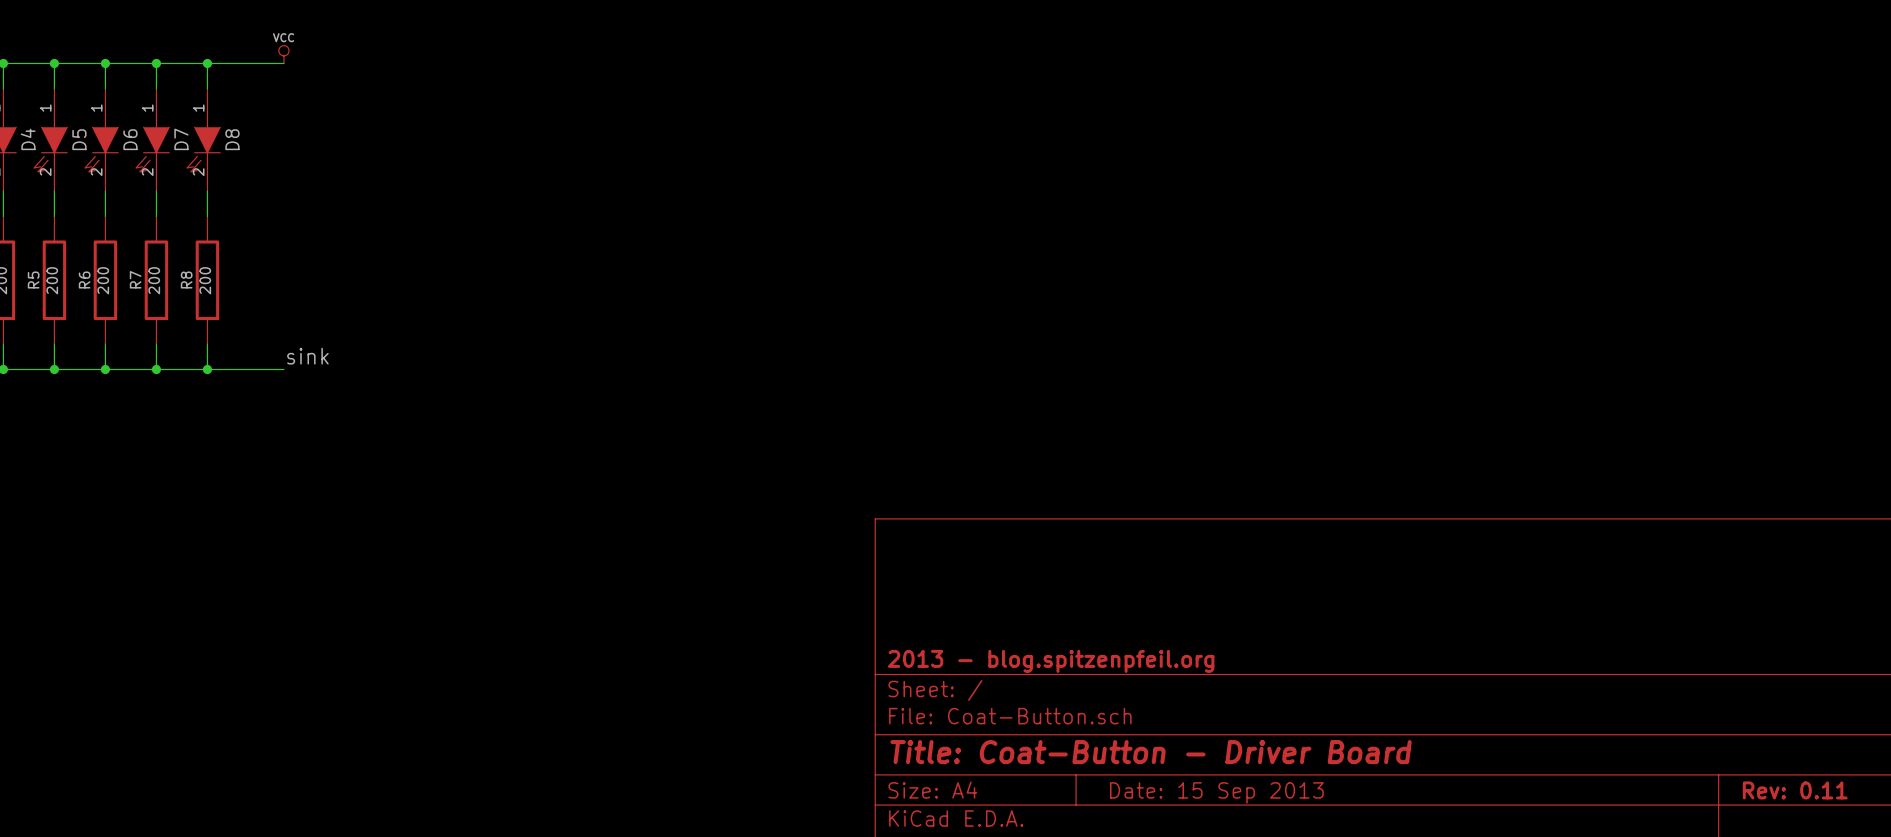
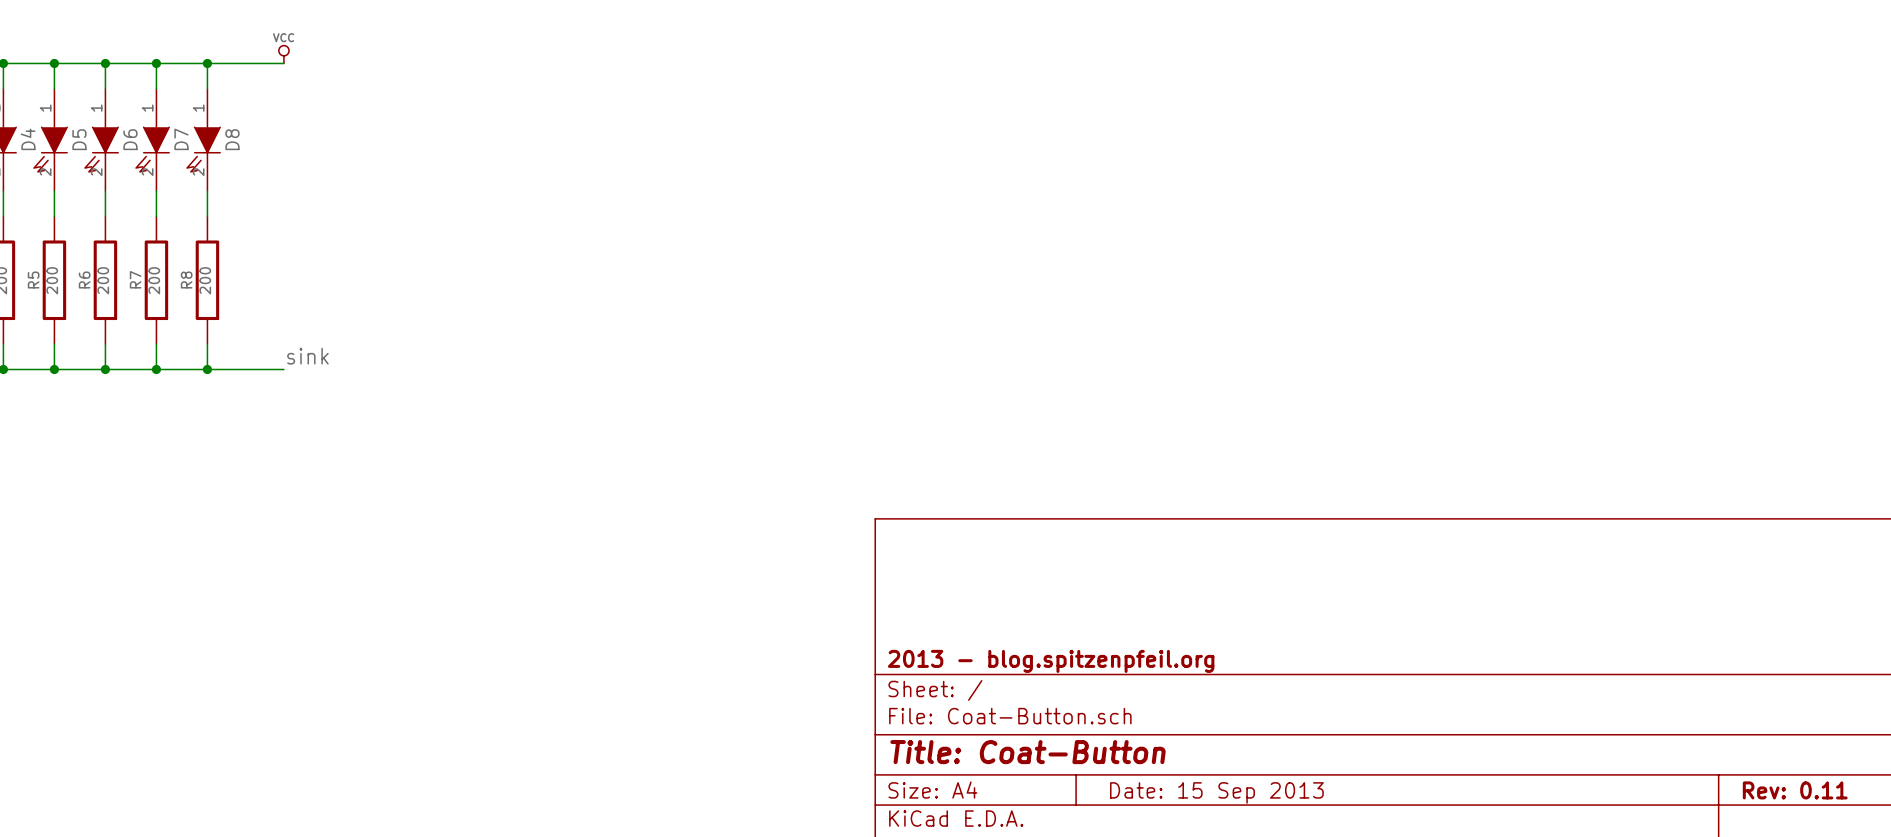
title block: Title: Coat-Button - Driver Board (1151, 752) -> Title: Coat-Button (1028, 752)

